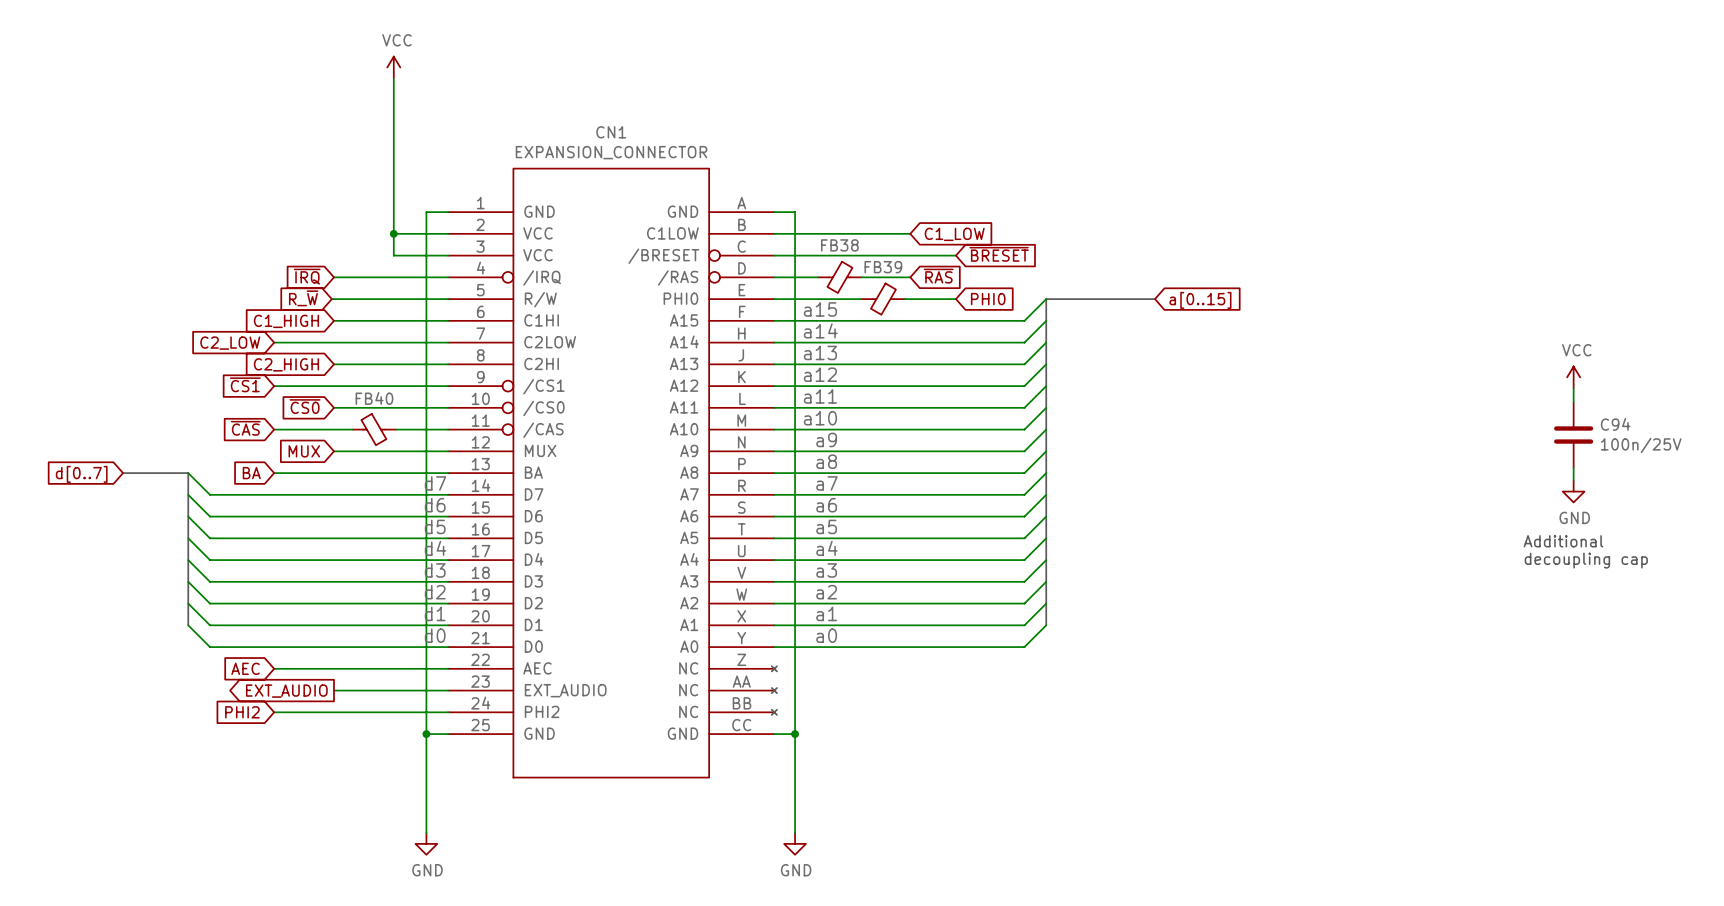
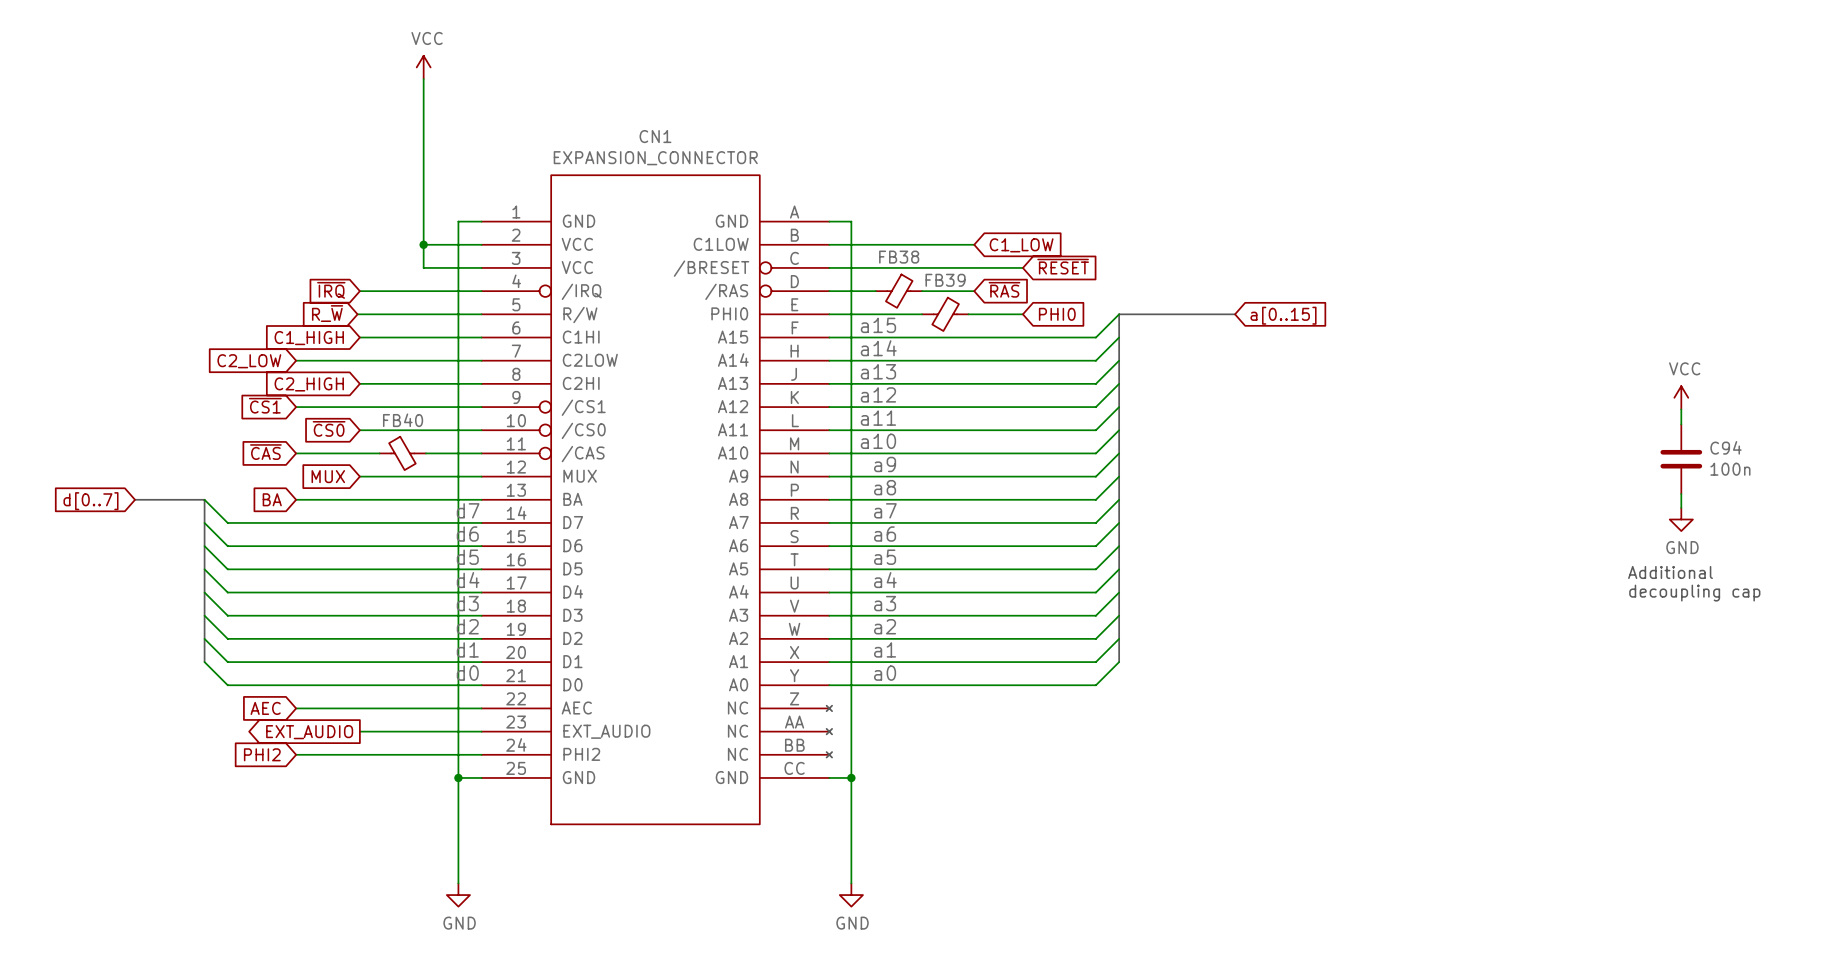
global label: ~{BRESET} (999, 254) -> ~{RESET} (1063, 266)
C94 value: 100n/25V (1641, 445) -> 100n (1730, 469)

